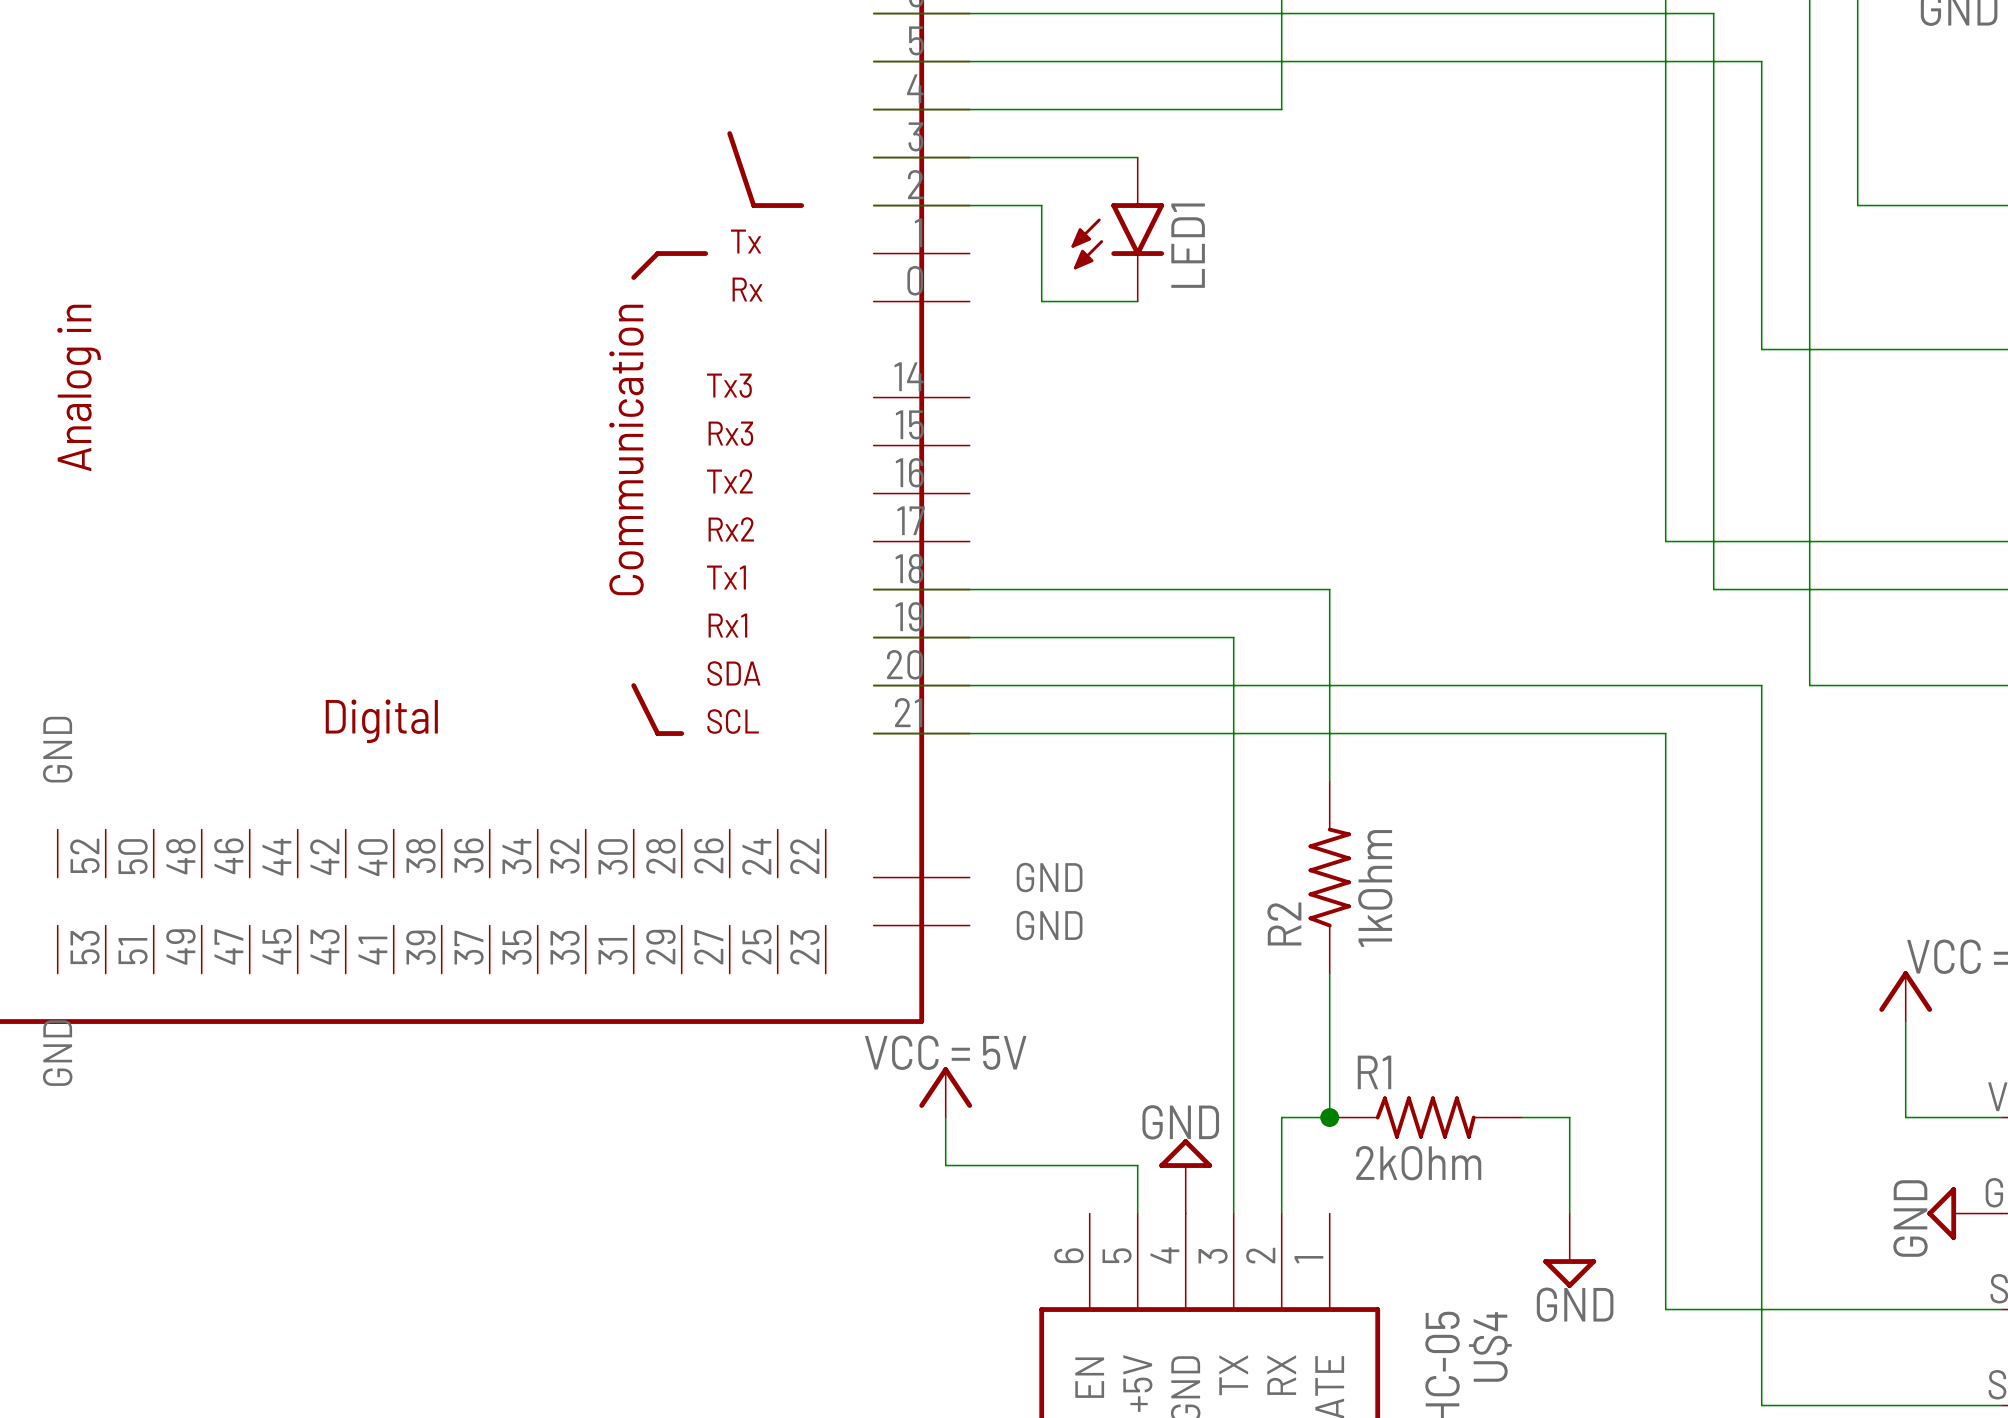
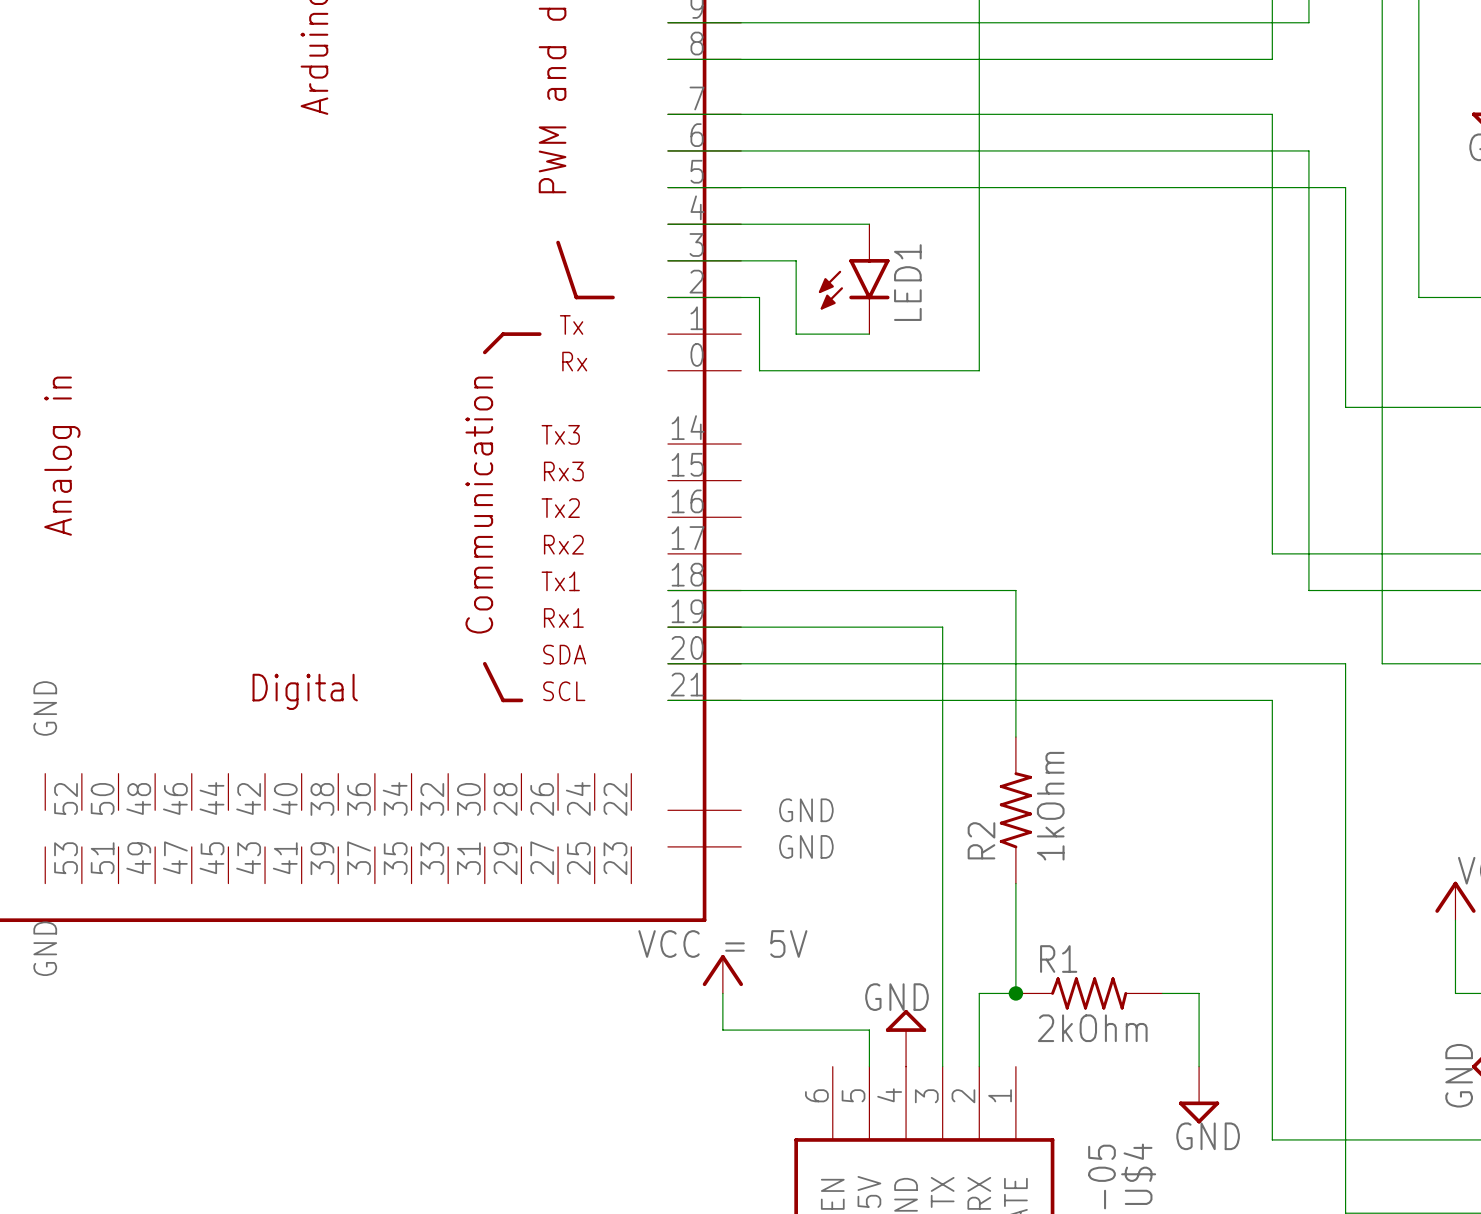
wire: (1137, 109) (1281, 109) -> (869, 370) (979, 370) (979, 224)
wire: (1041, 157) (1137, 157) -> (796, 334) (869, 334)
wire: (993, 205) (1041, 205) -> (796, 260) (796, 297)
LED1 position: (1117, 229) -> (854, 279)
wire: (1041, 253) (1041, 301) -> (759, 297) (759, 370) (796, 370)

